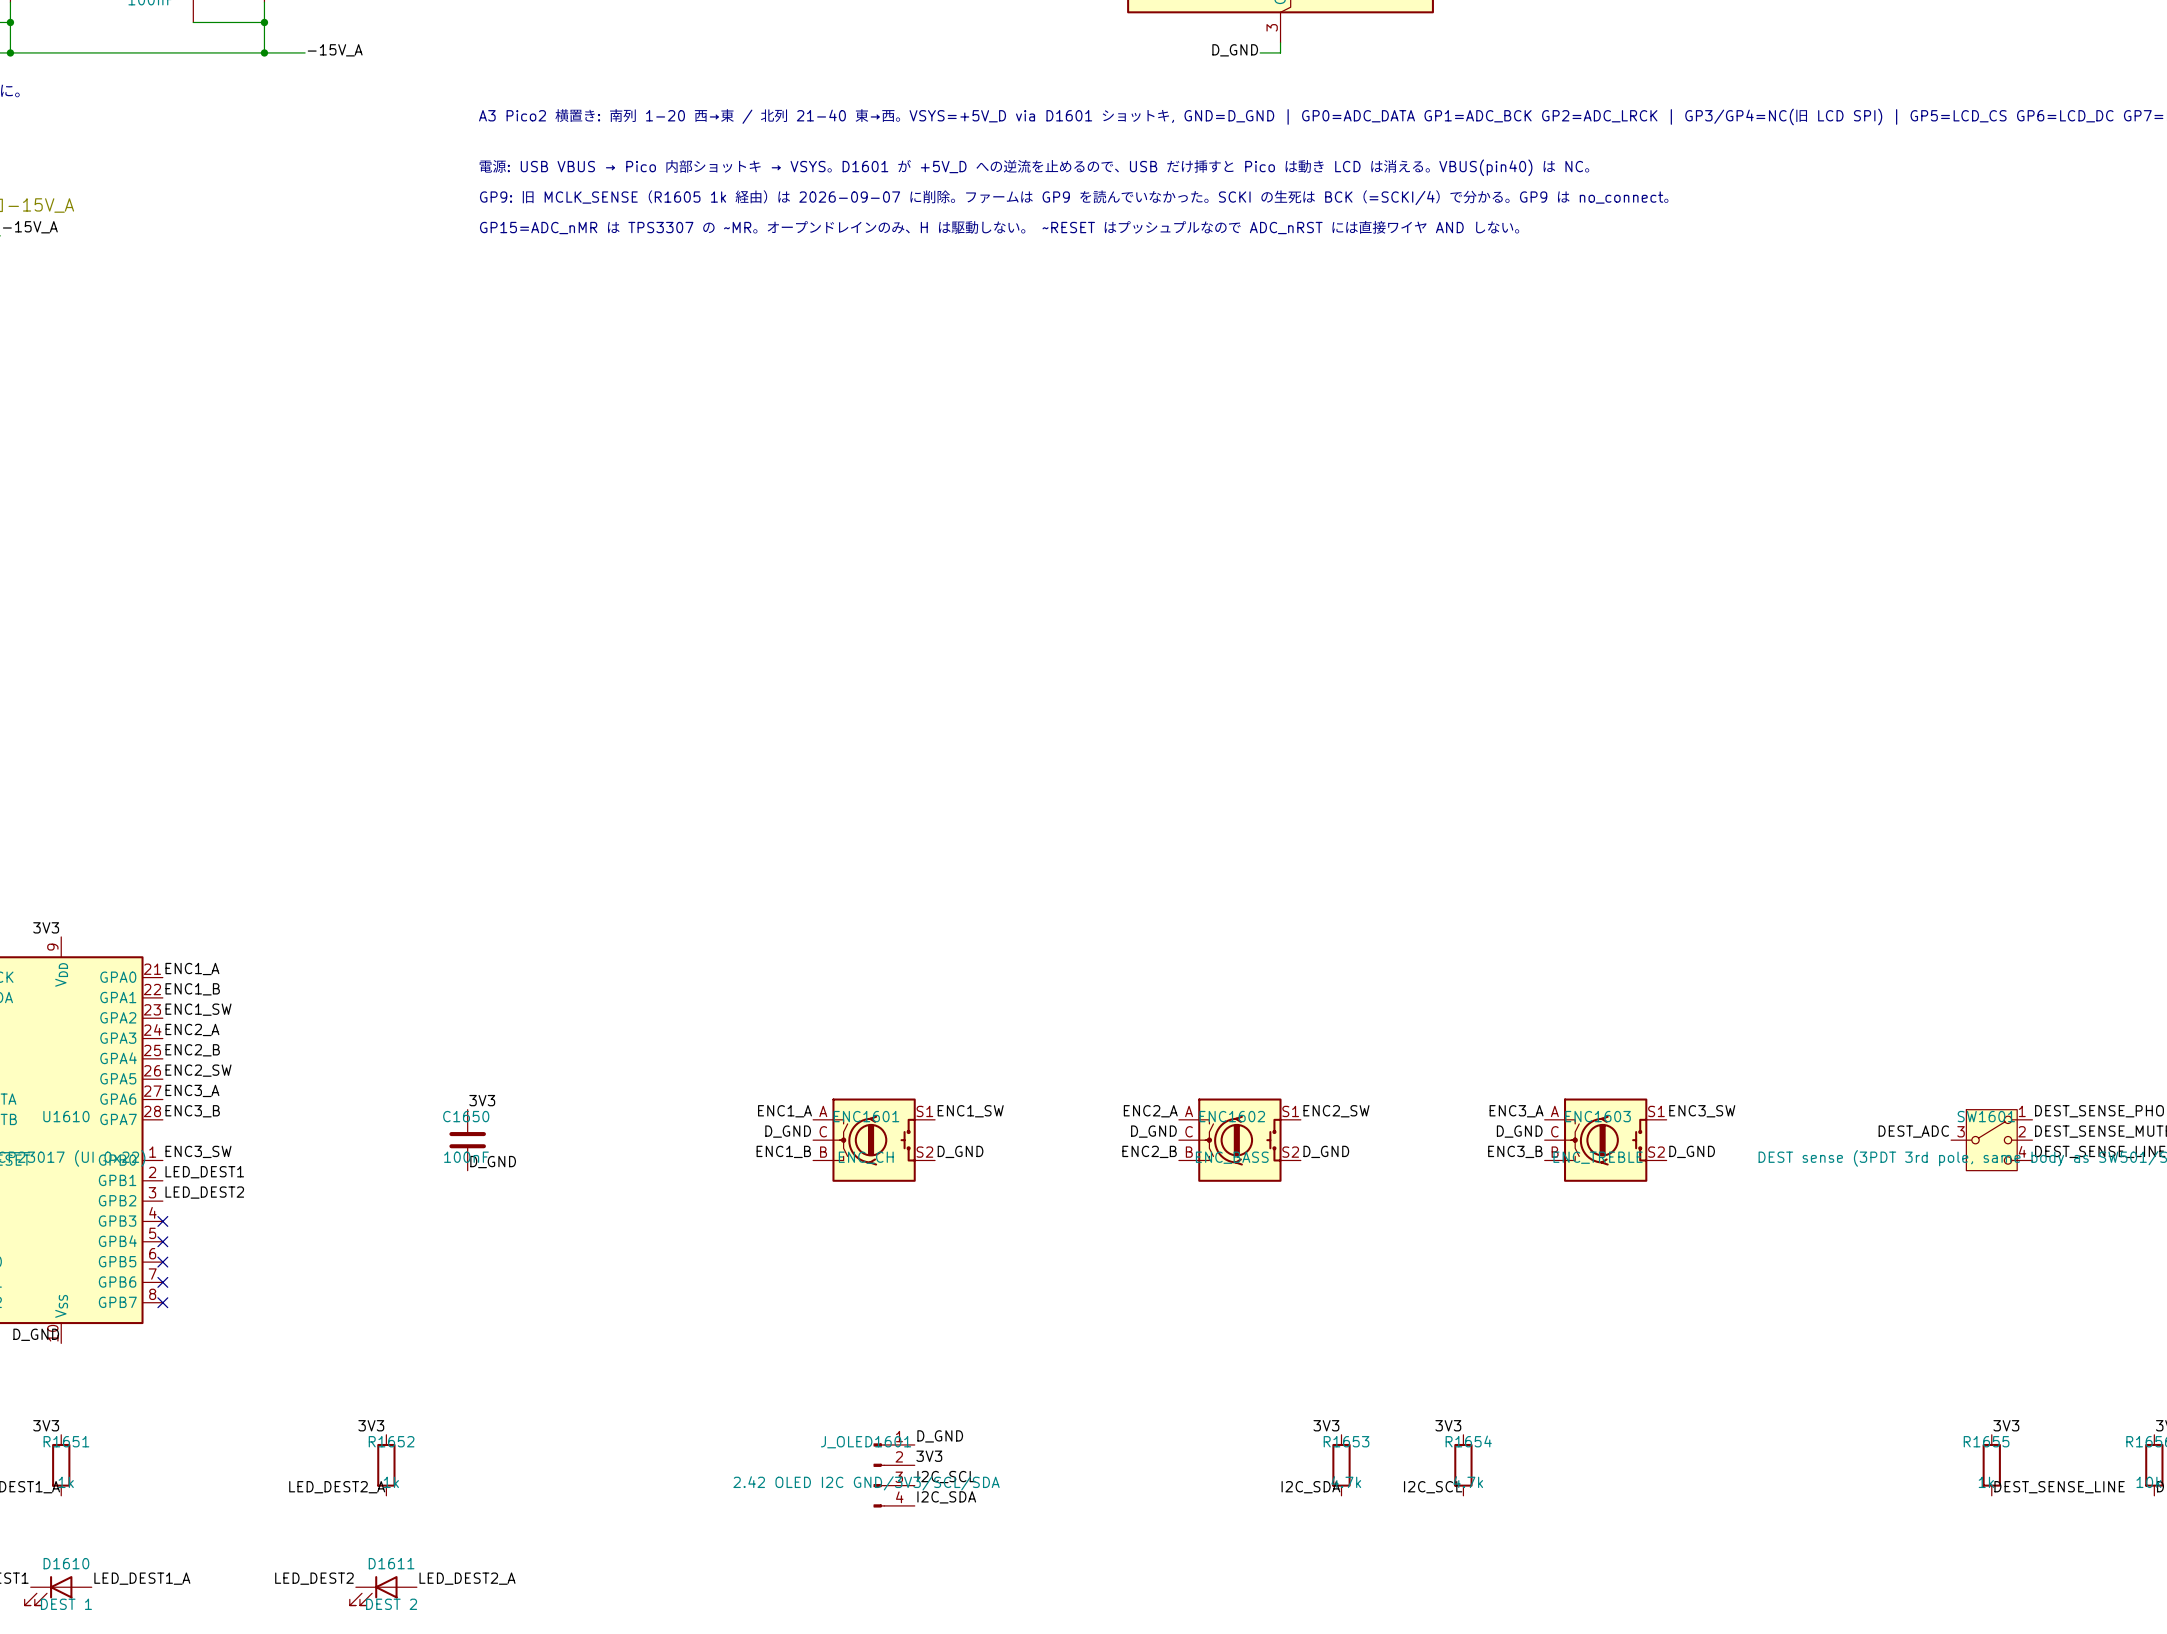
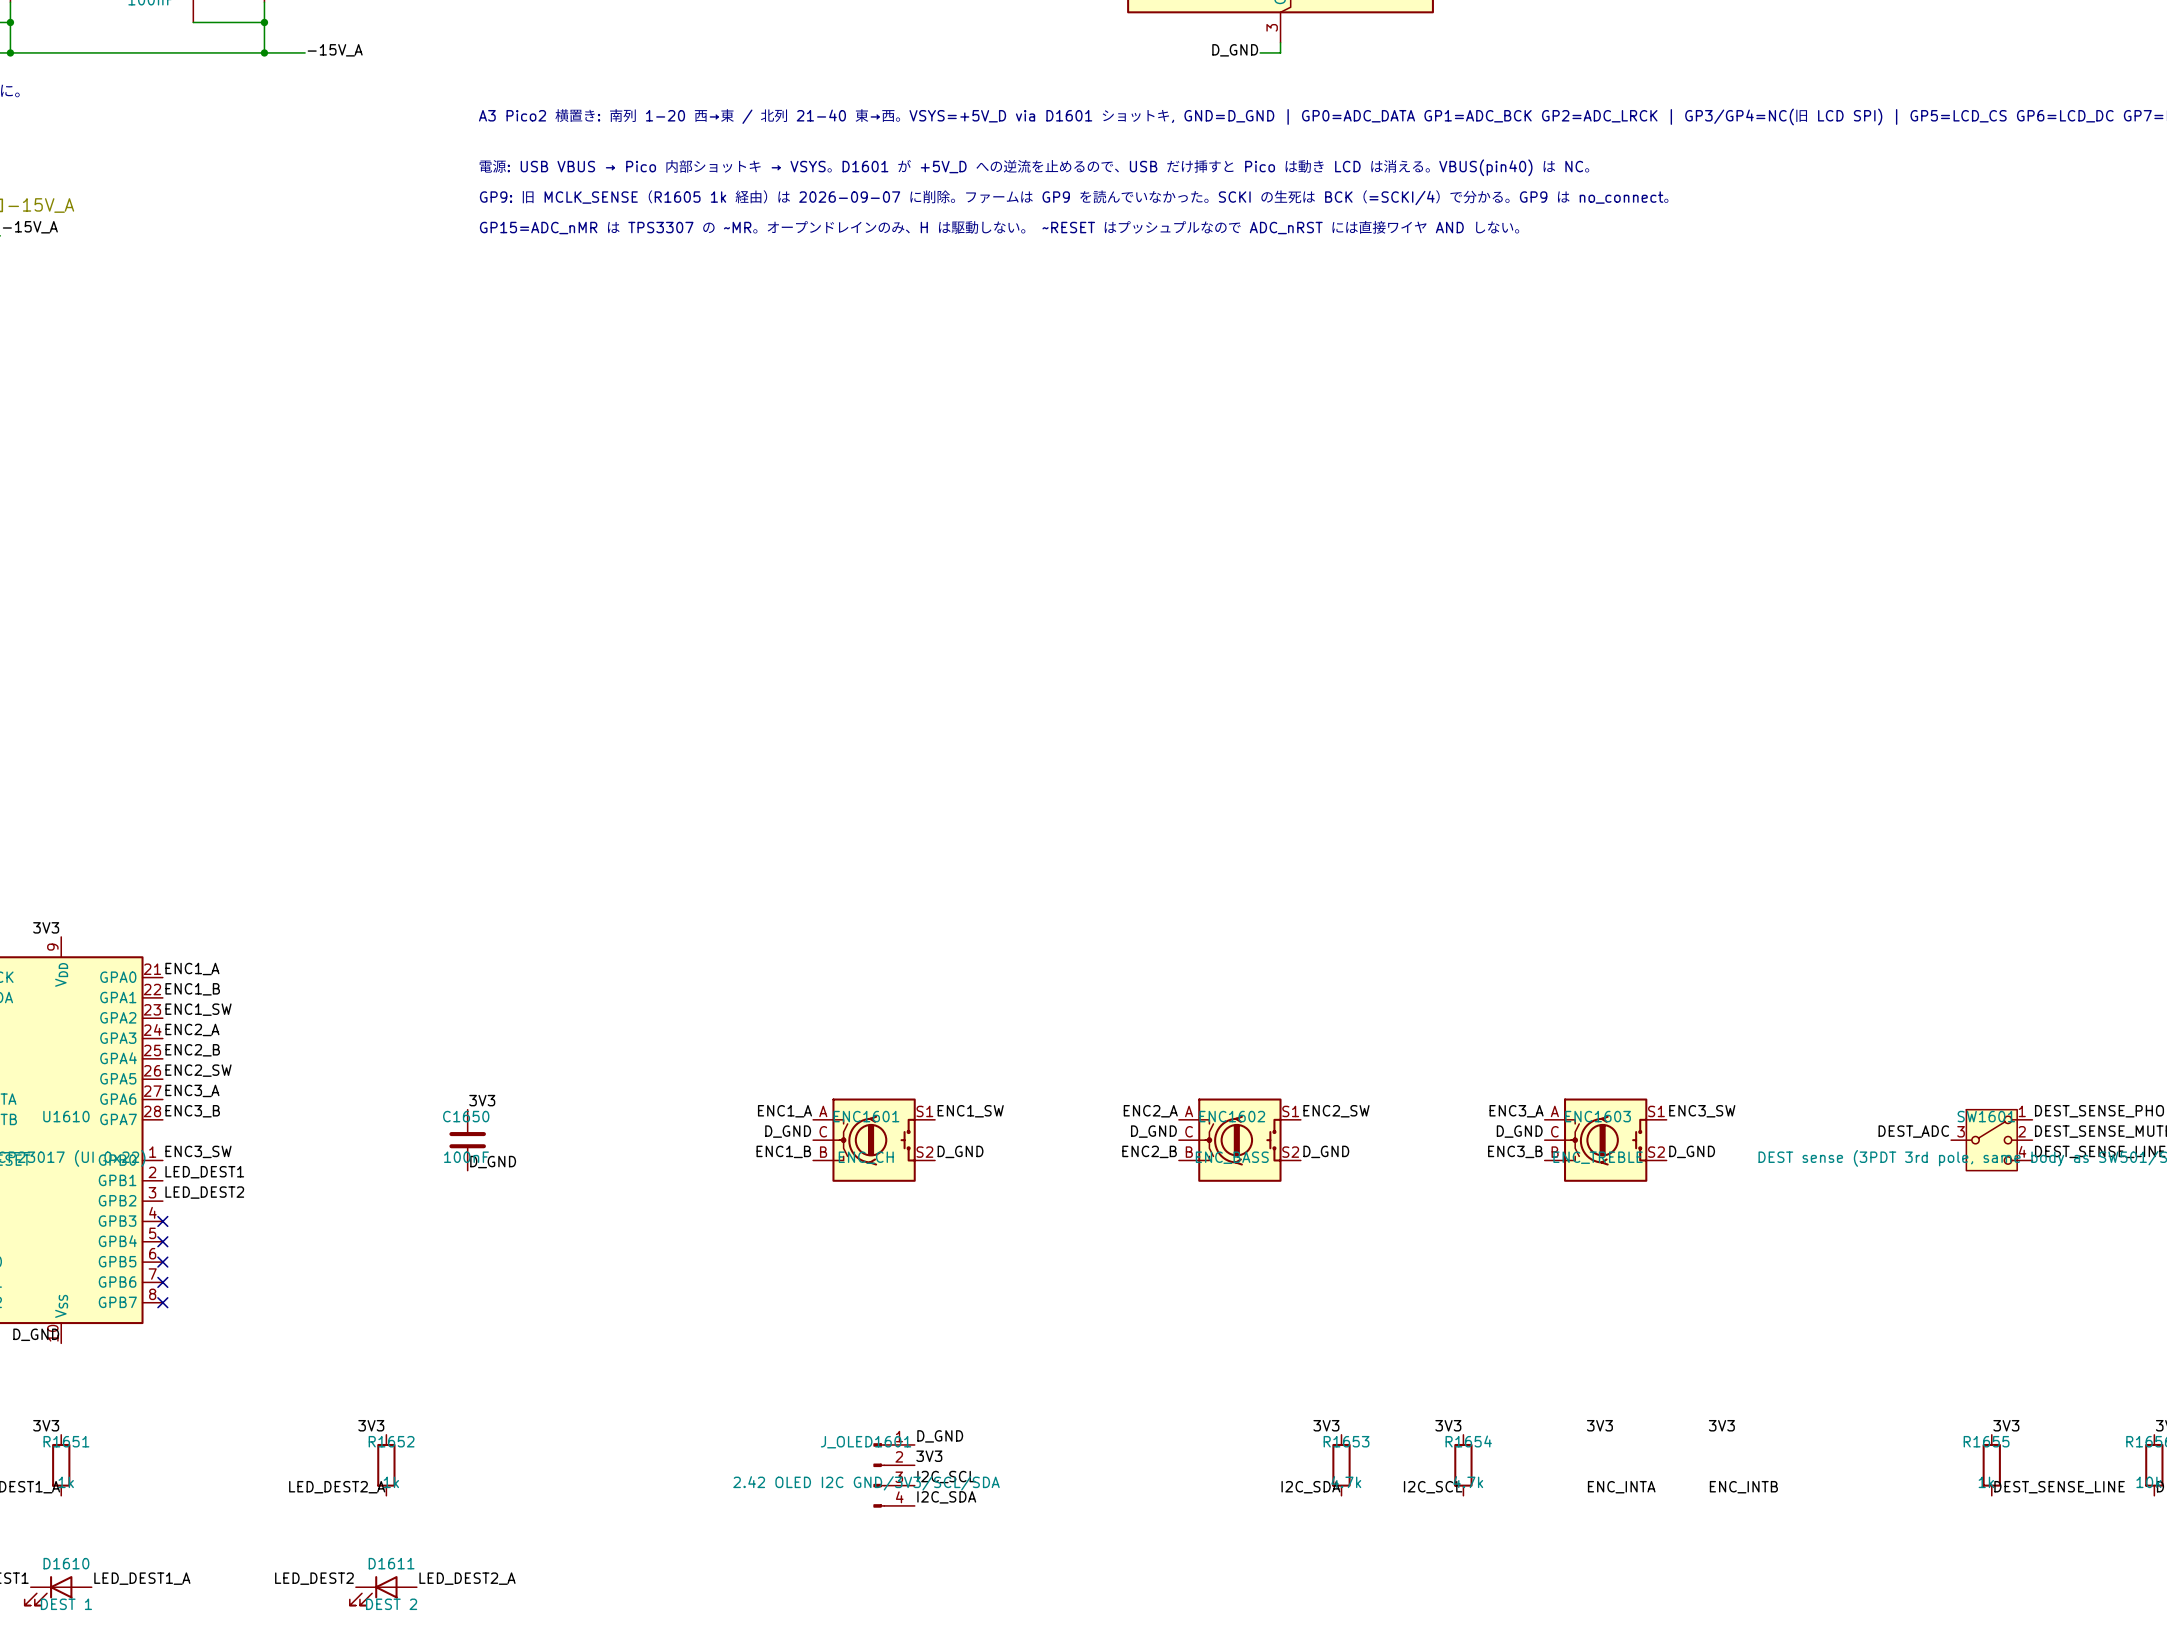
label: none -> 3V3 (1599, 1425)
label: none -> 3V3 (1721, 1425)
label: none -> ENC_INTA (1621, 1487)
label: none -> ENC_INTB (1743, 1487)

